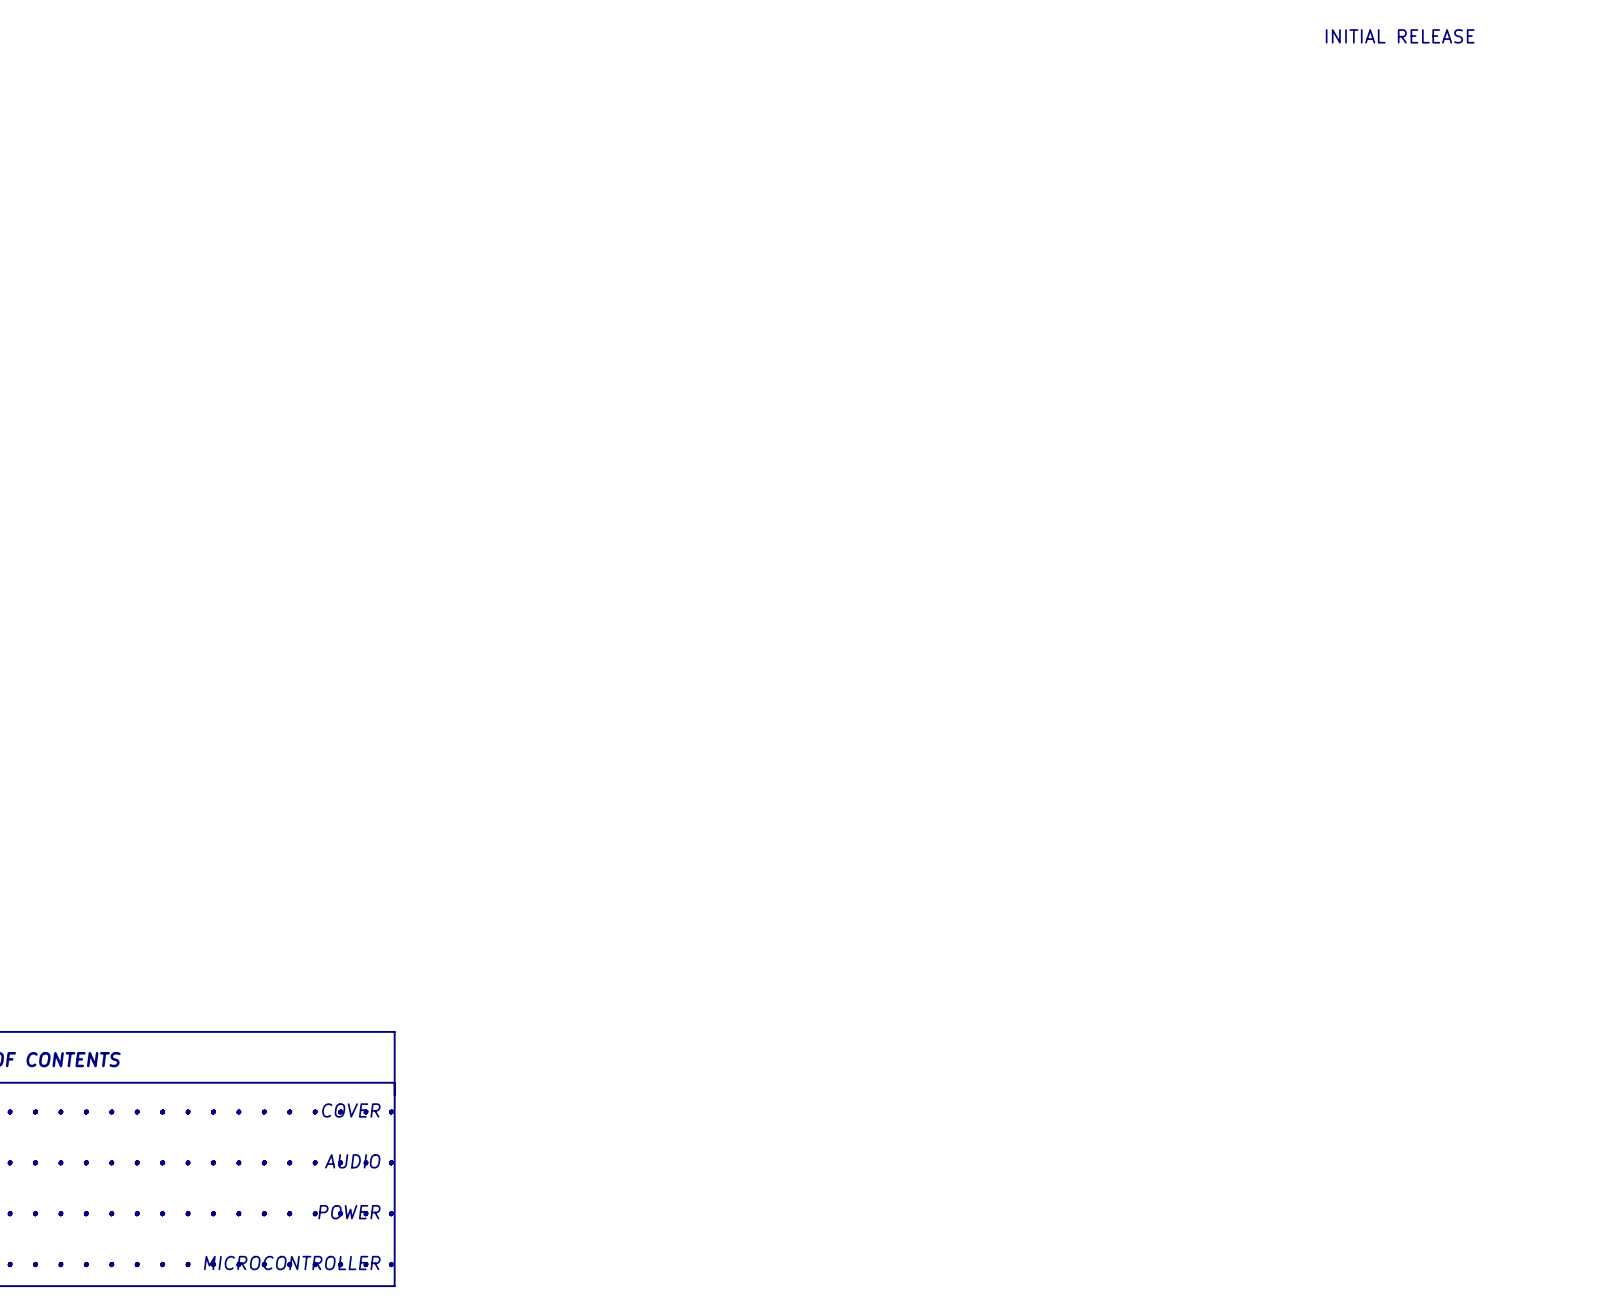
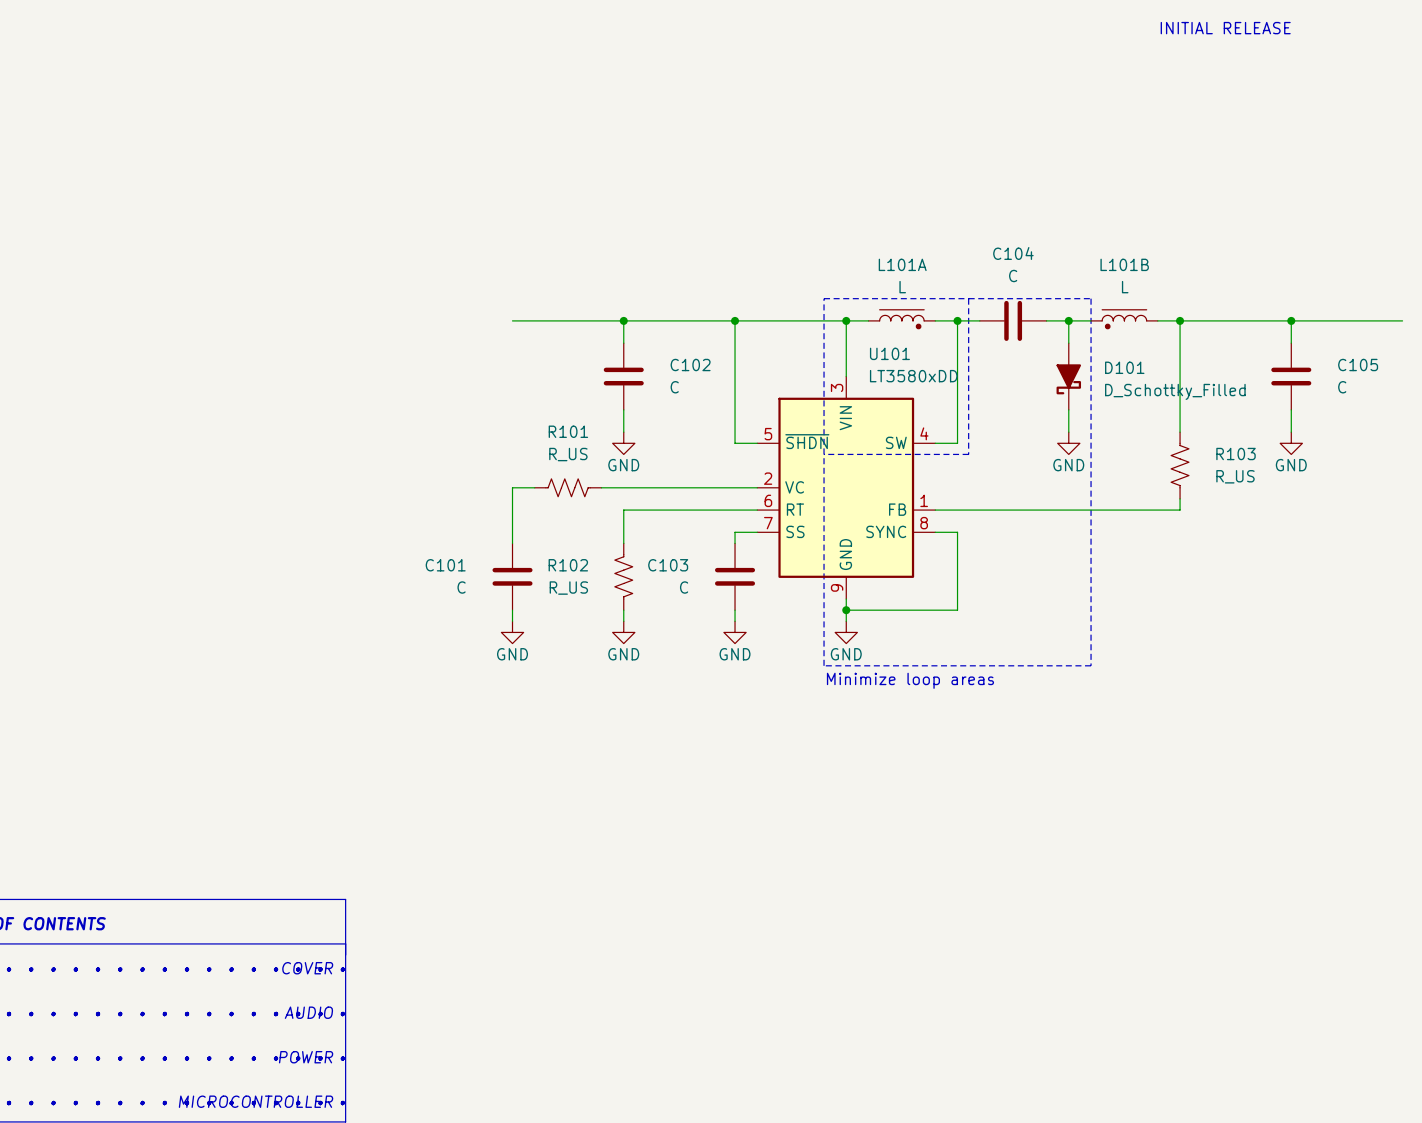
line: none -> (824, 298) (824, 665) (1091, 665) (1091, 298) (824, 298)
line: none -> (968, 298) (968, 454) (824, 454)
L101A: none -> L (901, 319)
L101B: none -> L (1124, 319)
wire: none -> (512, 320) (868, 320)
wire: none -> (623, 320) (623, 343)
junction: none -> (623, 320)
wire: none -> (735, 320) (735, 443) (757, 443)
junction: none -> (735, 320)
wire: none -> (846, 320) (846, 376)
junction: none -> (846, 320)
wire: none -> (935, 320) (979, 320)
wire: none -> (957, 320) (957, 443) (935, 443)
junction: none -> (957, 320)
C104: none -> C (1013, 320)
wire: none -> (1046, 320) (1091, 320)
wire: none -> (1068, 320) (1068, 343)
junction: none -> (1068, 320)
wire: none -> (1157, 320) (1402, 320)
wire: none -> (1180, 320) (1180, 432)
junction: none -> (1180, 320)
wire: none -> (1291, 320) (1291, 343)
junction: none -> (1291, 320)
C102: none -> C (623, 376)
D101: none -> D_Schottky_Filled (1068, 376)
C105: none -> C (1291, 376)
wire: none -> (623, 409) (623, 432)
wire: none -> (1068, 409) (1068, 432)
wire: none -> (1291, 409) (1291, 432)
power symbol: none -> GND (623, 443)
power symbol: none -> GND (1068, 443)
power symbol: none -> GND (1291, 443)
R103: none -> R_US (1180, 465)
wire: none -> (534, 487) (512, 487) (512, 543)
R101: none -> R_US (568, 487)
wire: none -> (601, 487) (757, 487)
U101: none -> LT3580xDD (846, 487)
wire: none -> (1180, 498) (1180, 510) (935, 510)
wire: none -> (757, 510) (623, 510) (623, 543)
wire: none -> (757, 532) (735, 532) (735, 543)
wire: none -> (935, 532) (957, 532) (957, 610) (846, 610)
C101: none -> C (512, 576)
R102: none -> R_US (623, 576)
C103: none -> C (735, 576)
wire: none -> (846, 599) (846, 621)
wire: none -> (512, 610) (512, 621)
wire: none -> (623, 610) (623, 621)
wire: none -> (735, 610) (735, 621)
junction: none -> (846, 610)
power symbol: none -> GND (512, 632)
power symbol: none -> GND (623, 632)
power symbol: none -> GND (735, 632)
power symbol: none -> GND (846, 632)
text: none -> Minimize loop areas (910, 680)

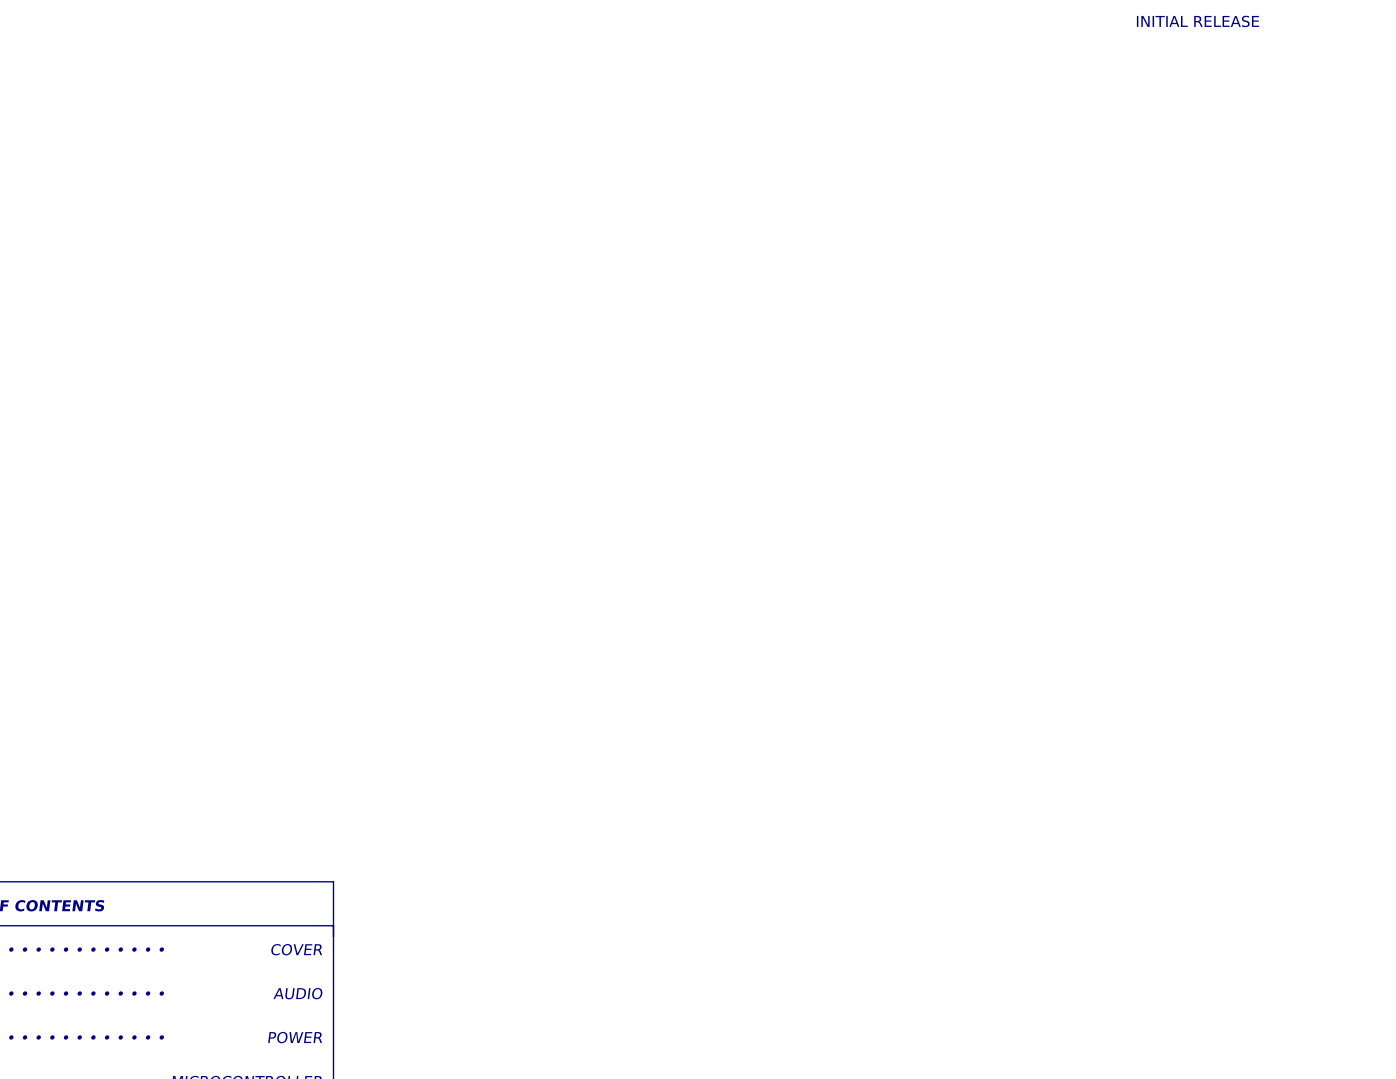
line: (824, 298) (824, 665) (1091, 665) (1091, 298) (824, 298) -> none
line: (968, 298) (968, 454) (824, 454) -> none
L101A: L (901, 319) -> none
L101B: L (1124, 319) -> none
wire: (512, 320) (868, 320) -> none
wire: (623, 320) (623, 343) -> none
junction: (623, 320) -> none
wire: (735, 320) (735, 443) (757, 443) -> none
junction: (735, 320) -> none
wire: (846, 320) (846, 376) -> none
junction: (846, 320) -> none
wire: (935, 320) (979, 320) -> none
wire: (957, 320) (957, 443) (935, 443) -> none
junction: (957, 320) -> none
C104: C (1013, 320) -> none
wire: (1046, 320) (1091, 320) -> none
wire: (1068, 320) (1068, 343) -> none
junction: (1068, 320) -> none
wire: (1157, 320) (1402, 320) -> none
wire: (1180, 320) (1180, 432) -> none
junction: (1180, 320) -> none
wire: (1291, 320) (1291, 343) -> none
junction: (1291, 320) -> none
C102: C (623, 376) -> none
D101: D_Schottky_Filled (1068, 376) -> none
C105: C (1291, 376) -> none
wire: (623, 409) (623, 432) -> none
wire: (1068, 409) (1068, 432) -> none
wire: (1291, 409) (1291, 432) -> none
power symbol: GND (623, 443) -> none
power symbol: GND (1068, 443) -> none
power symbol: GND (1291, 443) -> none
R103: R_US (1180, 465) -> none
wire: (534, 487) (512, 487) (512, 543) -> none
R101: R_US (568, 487) -> none
wire: (601, 487) (757, 487) -> none
U101: LT3580xDD (846, 487) -> none
wire: (1180, 498) (1180, 510) (935, 510) -> none
wire: (757, 510) (623, 510) (623, 543) -> none
wire: (757, 532) (735, 532) (735, 543) -> none
wire: (935, 532) (957, 532) (957, 610) (846, 610) -> none
C101: C (512, 576) -> none
R102: R_US (623, 576) -> none
C103: C (735, 576) -> none
wire: (846, 599) (846, 621) -> none
wire: (512, 610) (512, 621) -> none
wire: (623, 610) (623, 621) -> none
wire: (735, 610) (735, 621) -> none
junction: (846, 610) -> none
power symbol: GND (512, 632) -> none
power symbol: GND (623, 632) -> none
power symbol: GND (735, 632) -> none
power symbol: GND (846, 632) -> none
text: Minimize loop areas (910, 680) -> none

